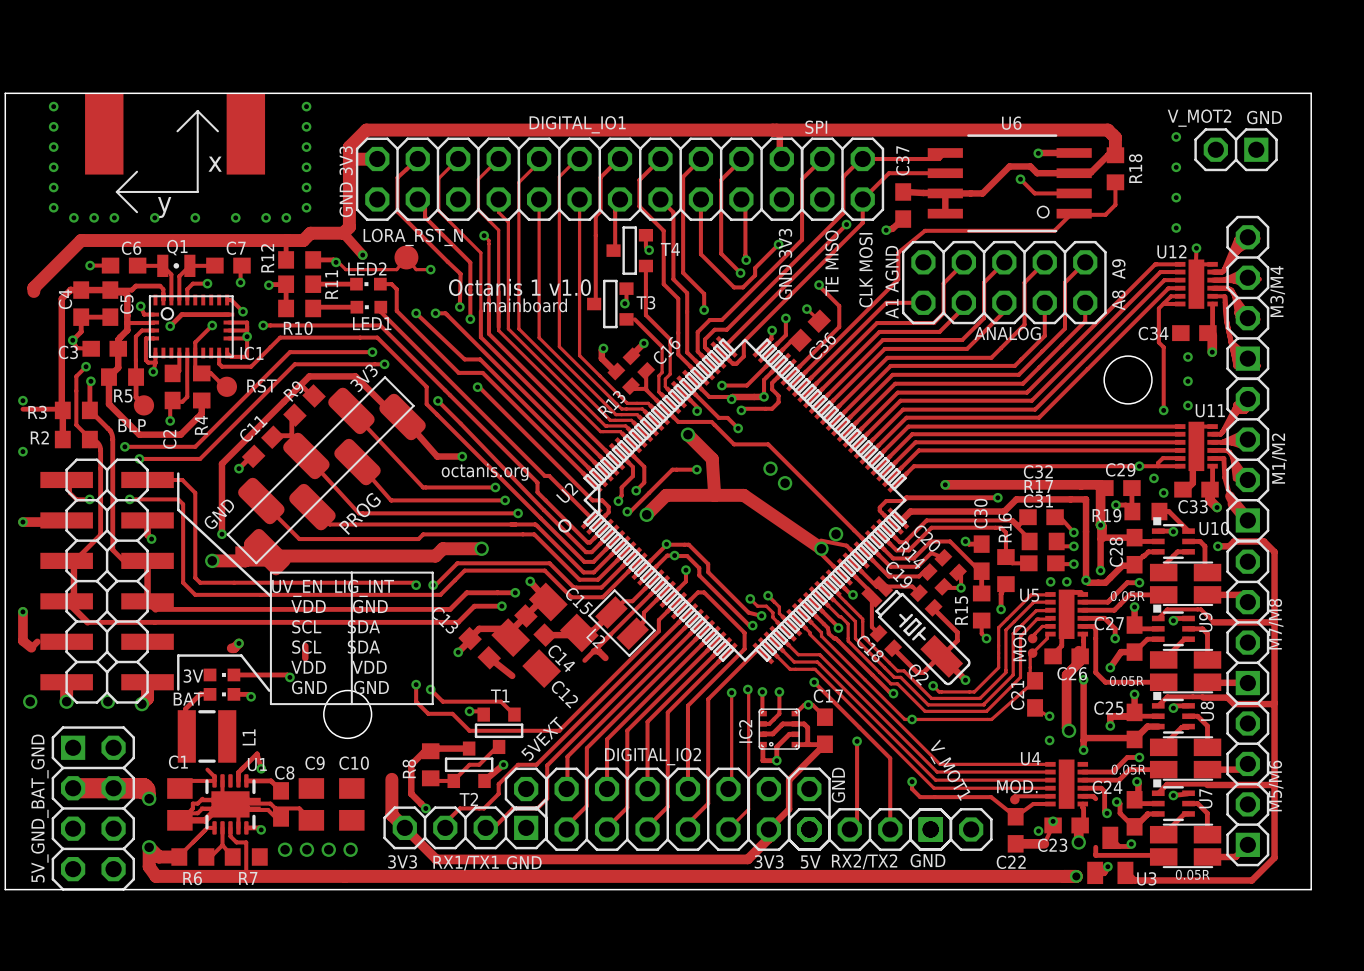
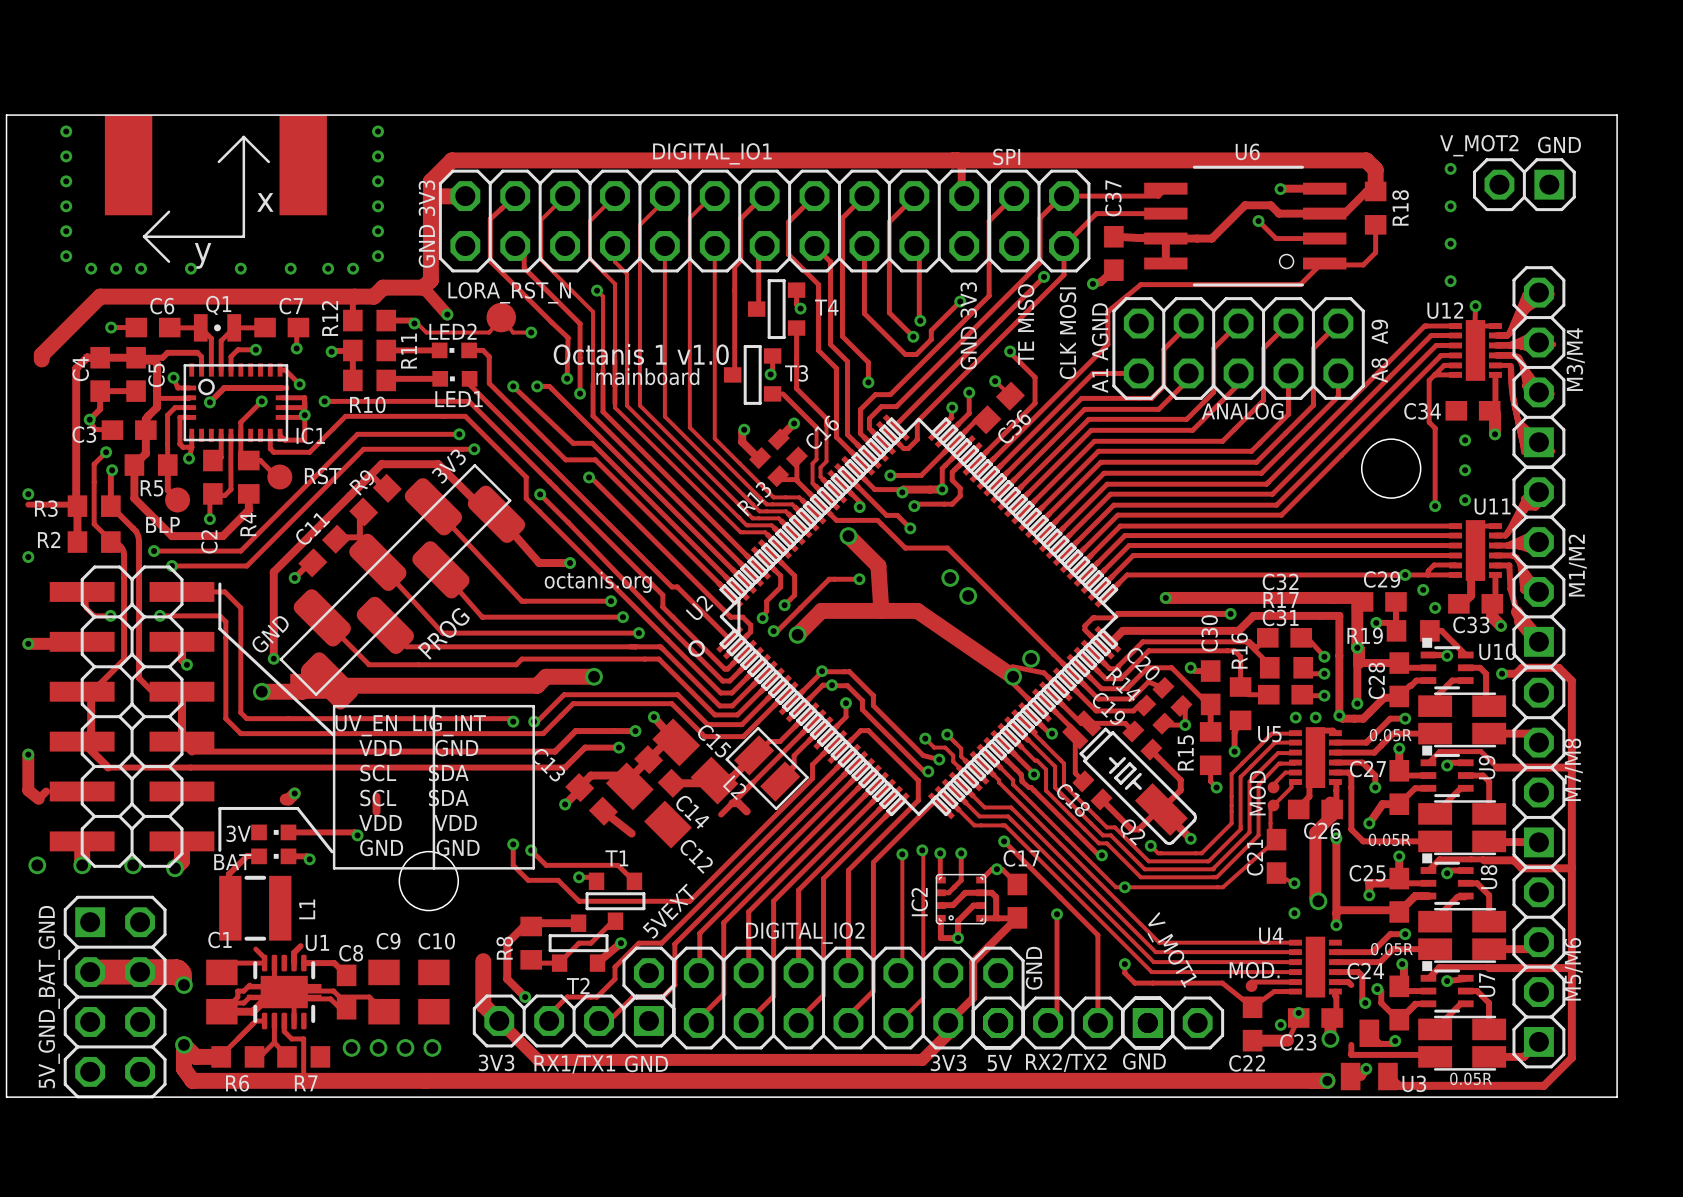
track: (261, 768) (257, 753) (241, 769) -> none
via: (261, 768) -> none
track: (246, 827) (259, 827) (261, 829) -> none
via: (261, 829) -> none

